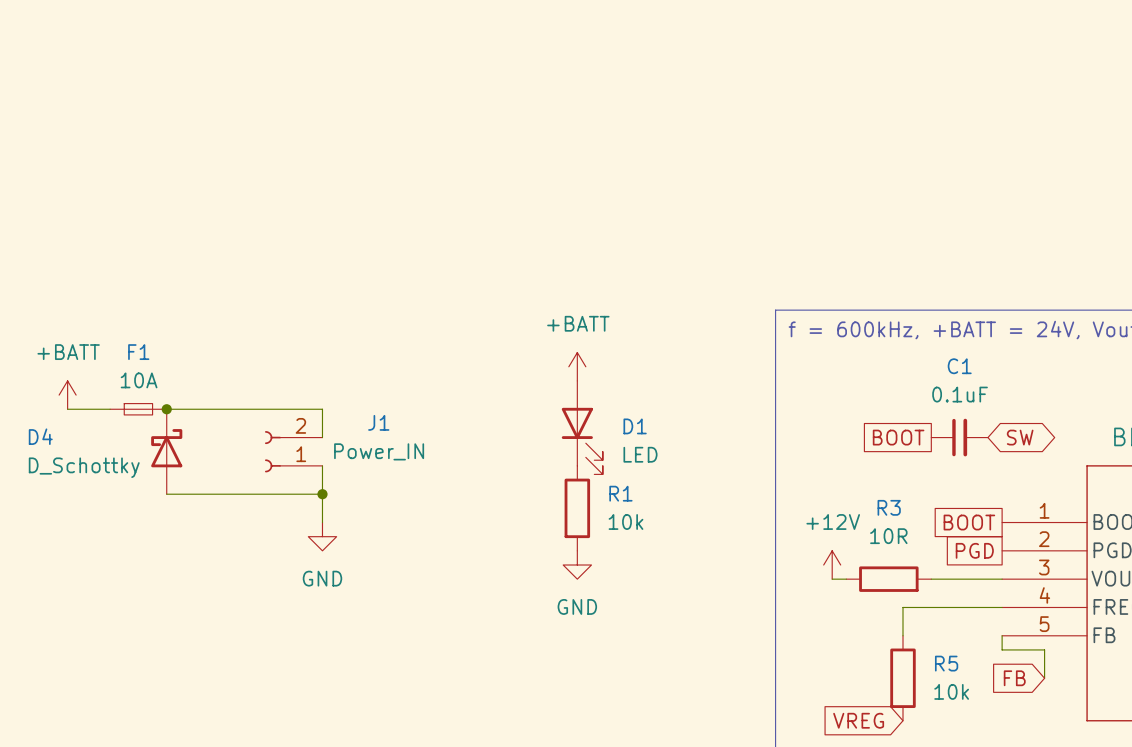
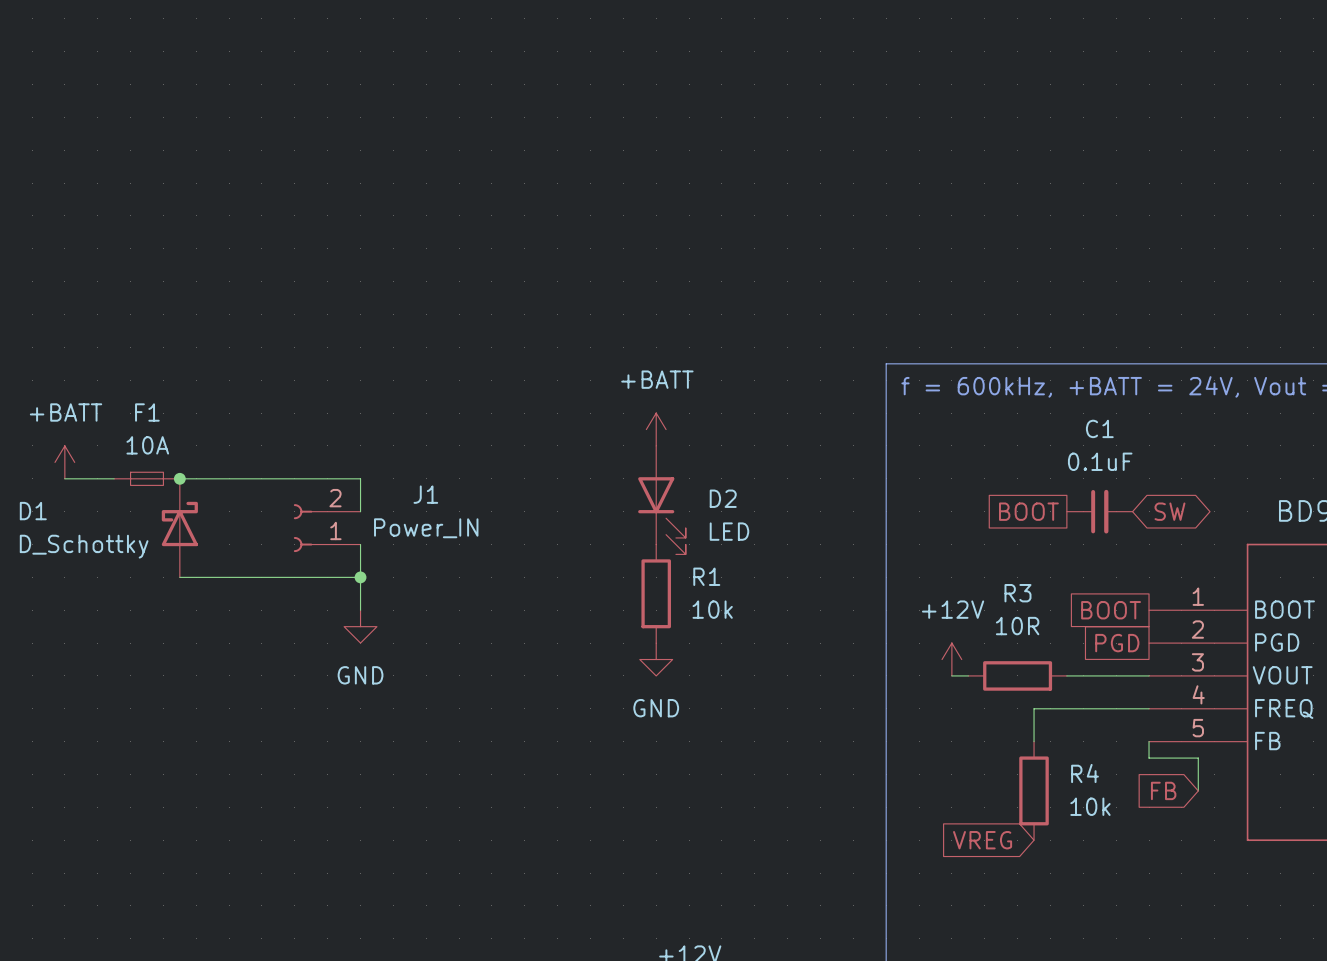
D1 name: D1 (635, 426) -> D2 (723, 498)
D4 name: D4 (40, 436) -> D1 (33, 511)
R5 name: R5 (946, 663) -> R4 (1084, 773)

